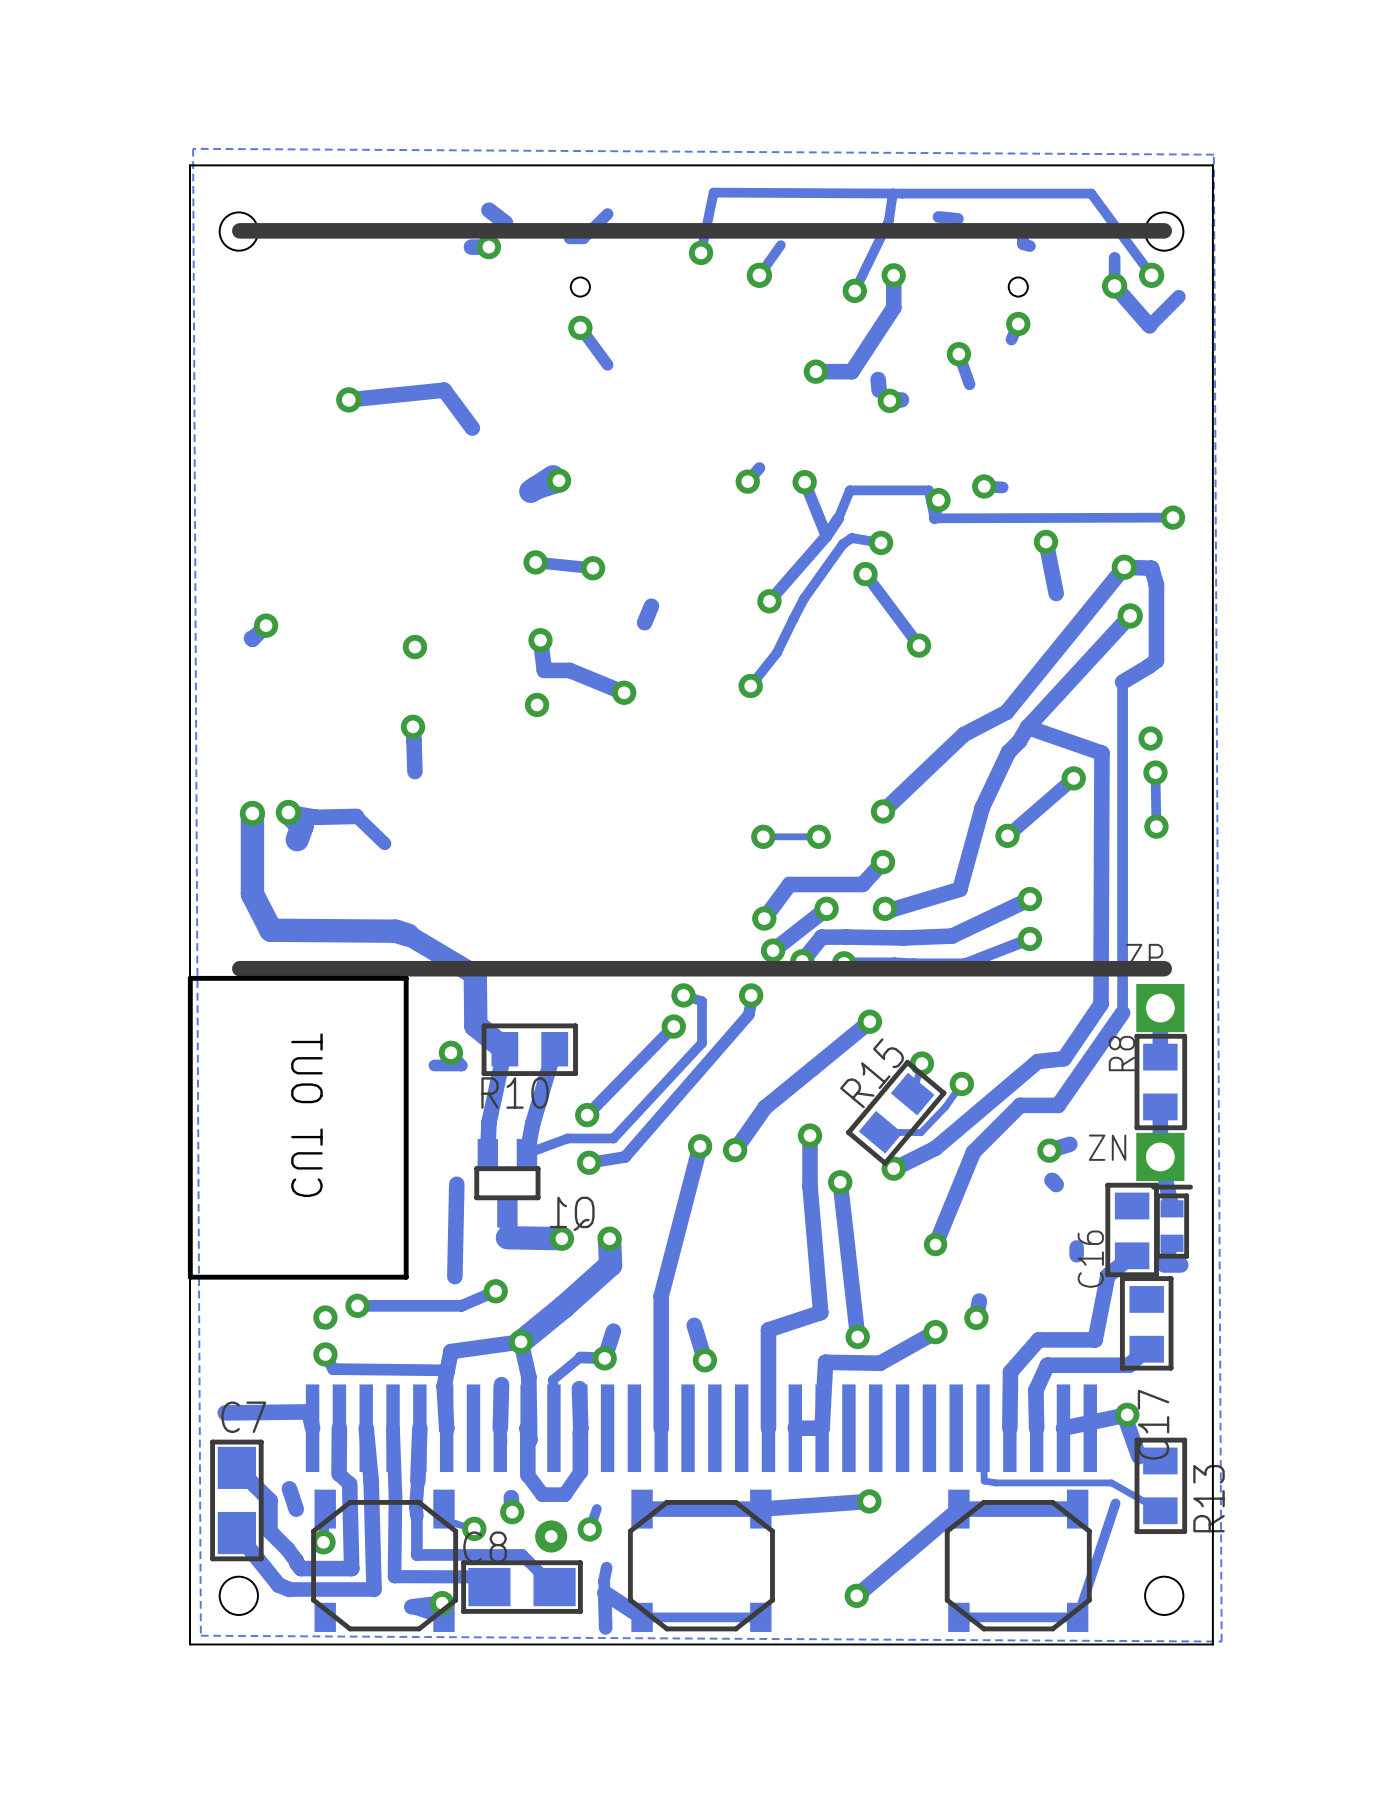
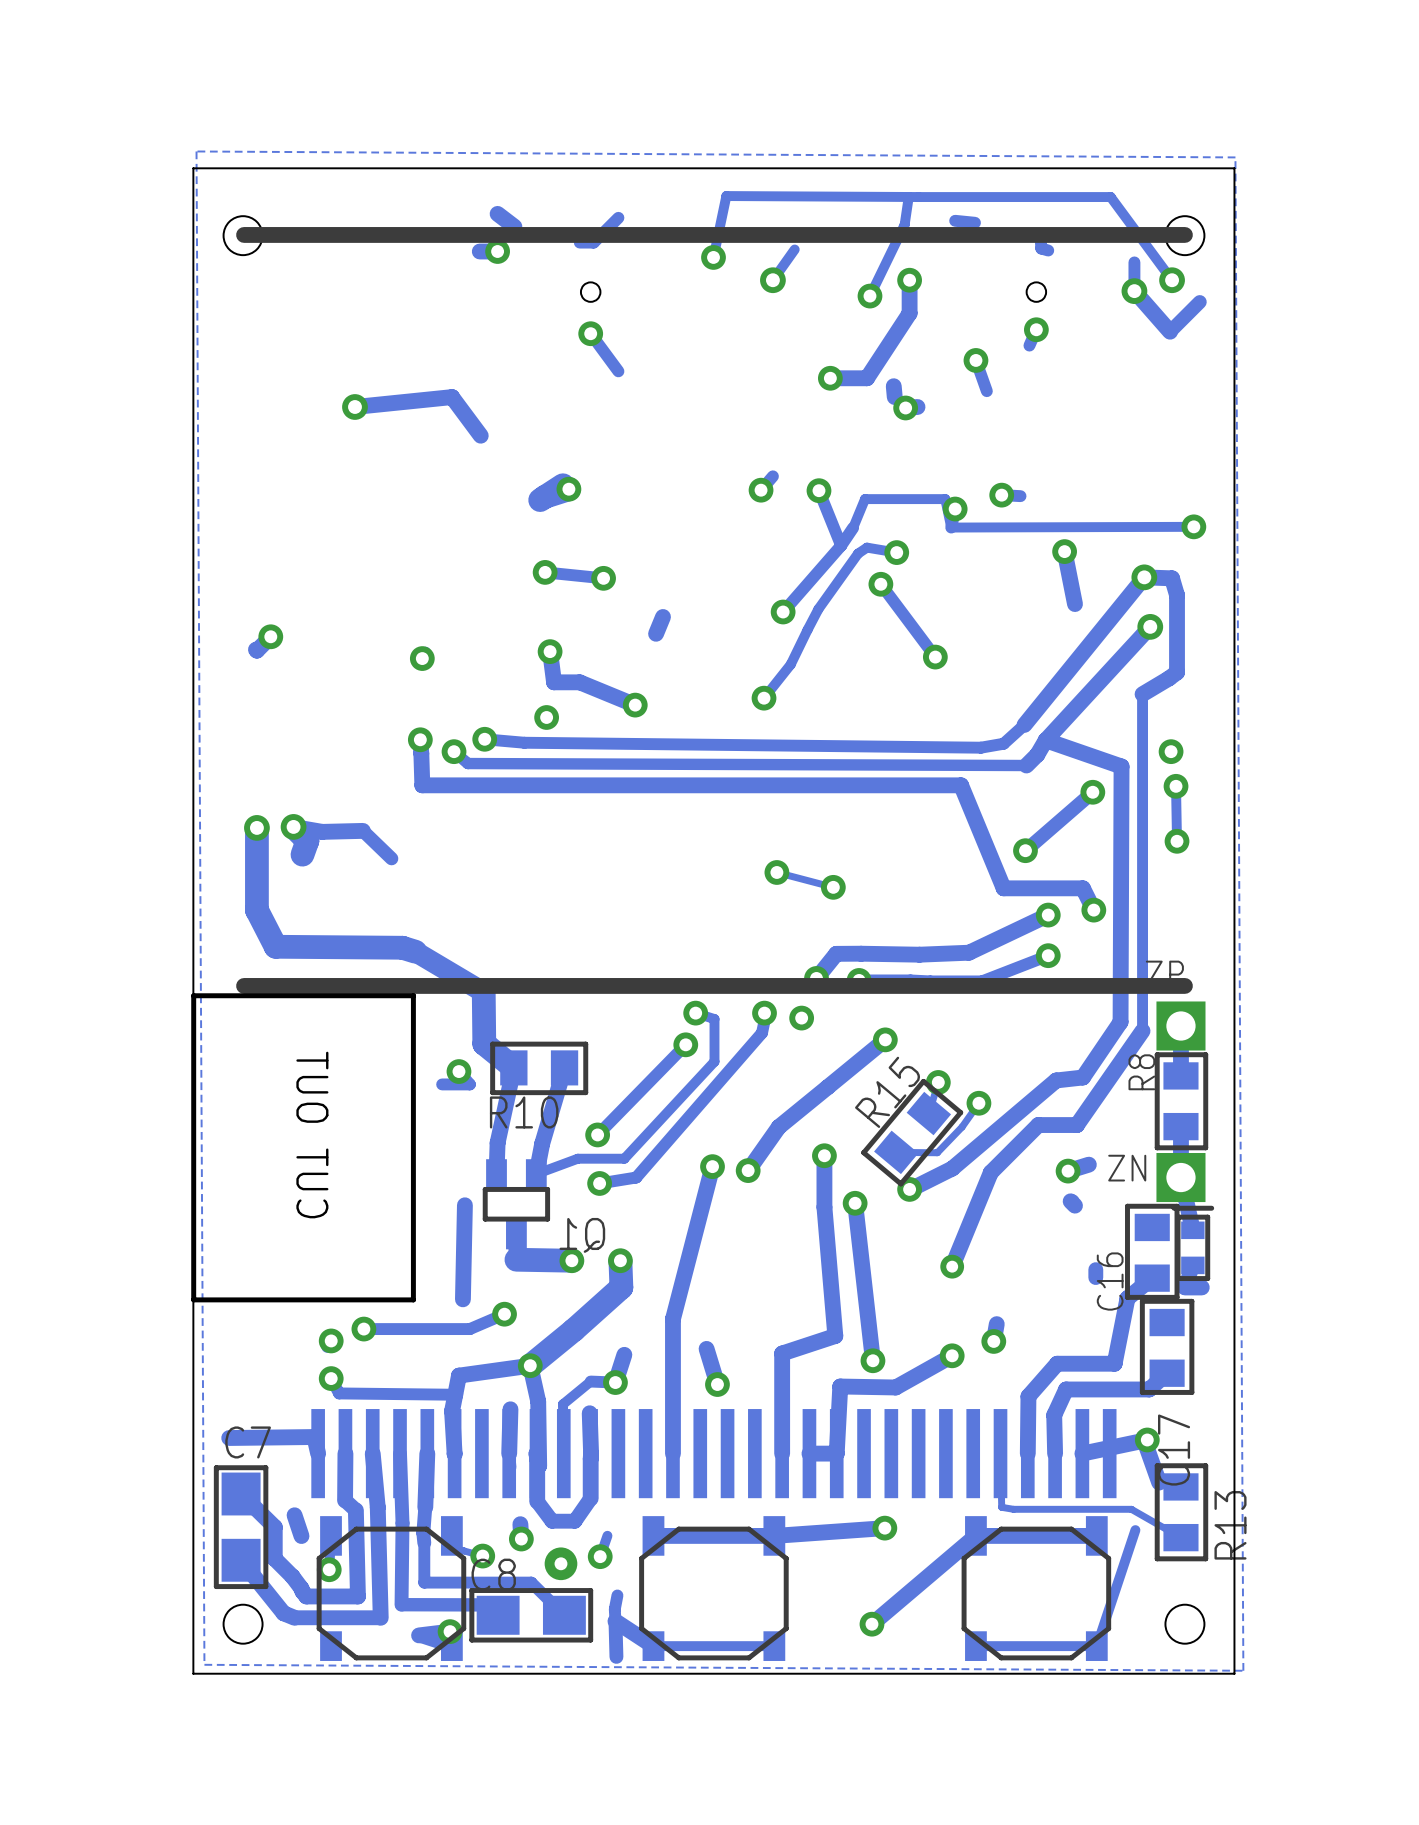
track: (1006, 712) (963, 734) (883, 811) -> (1024, 724) (1003, 743) (980, 747) (524, 742) (484, 739)
via: none -> (484, 739)
via: none -> (454, 751)
track: (1008, 752) (982, 807) (959, 889) (891, 909) (884, 908) -> (1026, 765) (467, 763) (454, 751)
track: none -> (422, 785) (961, 785) (1003, 888) (1082, 888) (1093, 910)
via: (883, 811) -> none
via position: (763, 836) -> (776, 872)
track: (818, 836) (763, 836) -> none
via: (818, 836) -> none
track: none -> (776, 872) (833, 887)
track: (883, 862) (862, 884) (789, 884) (764, 918) -> none
via: (883, 862) -> none
via: none -> (833, 887)
via: none -> (1093, 910)
track: (826, 908) (773, 950) -> none
via: (826, 908) -> none
via: (884, 908) -> none
via: (764, 918) -> none
via: (773, 950) -> none
via: none -> (801, 1018)

